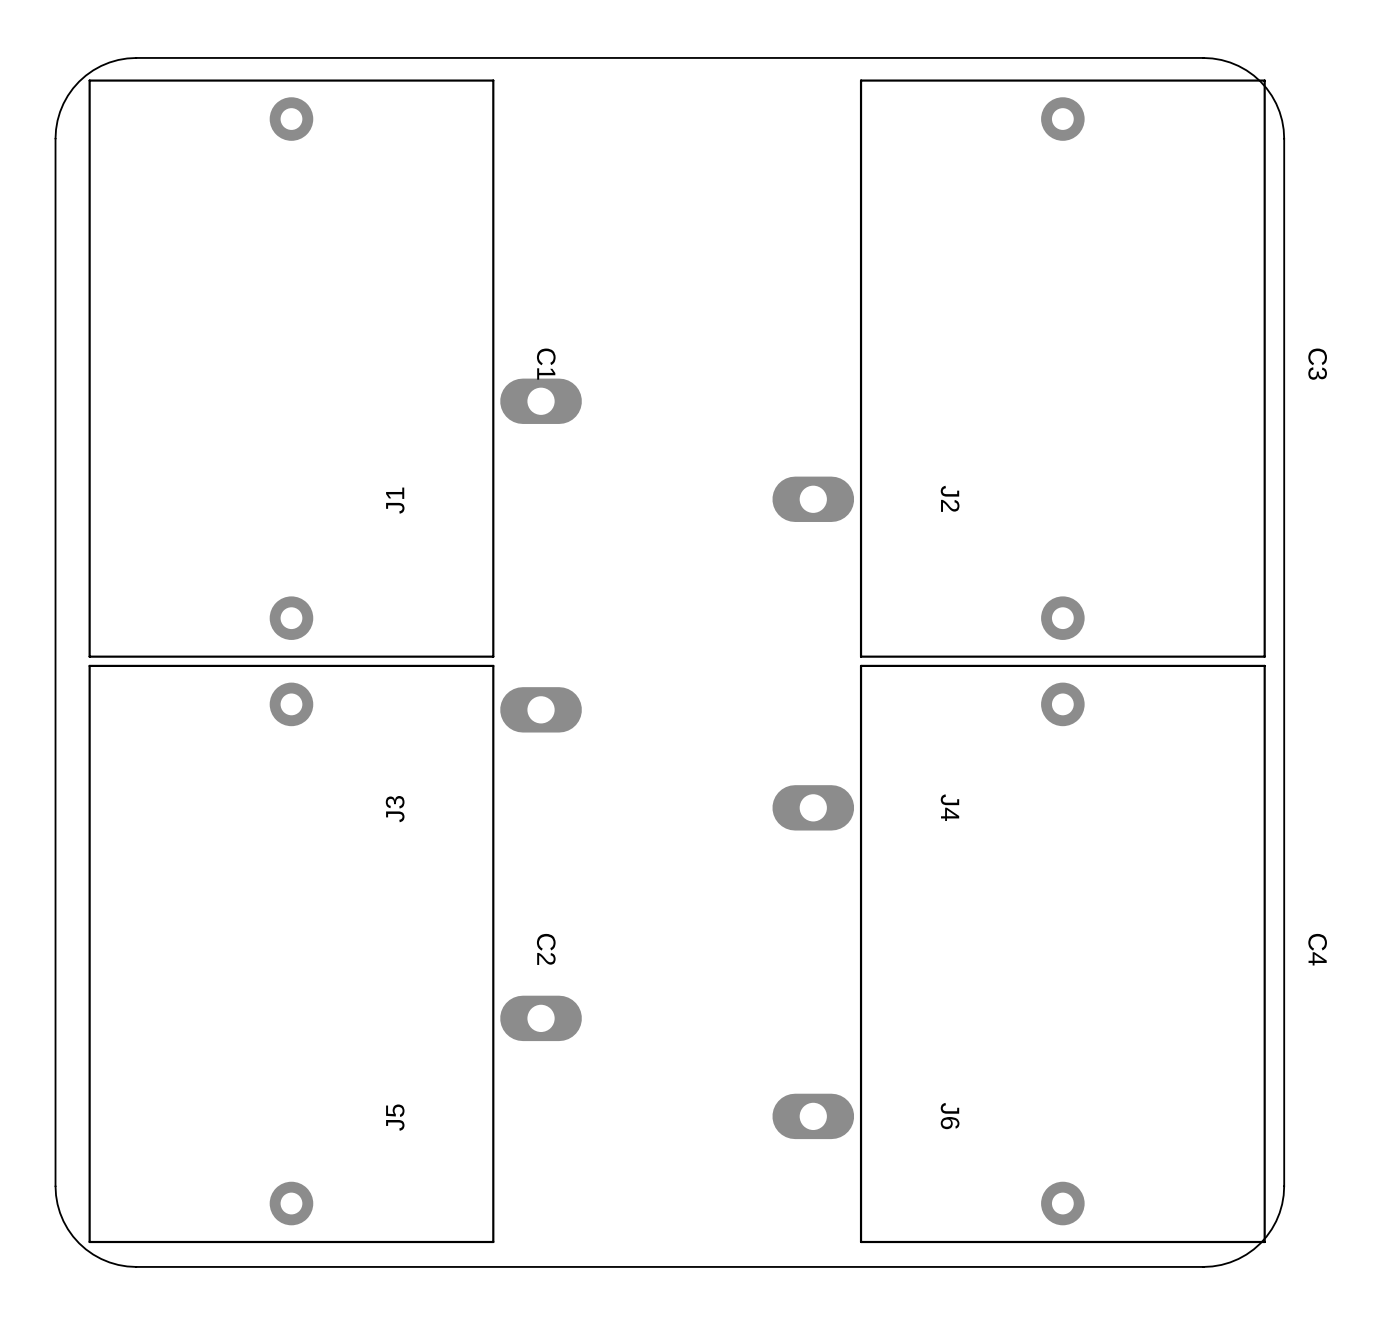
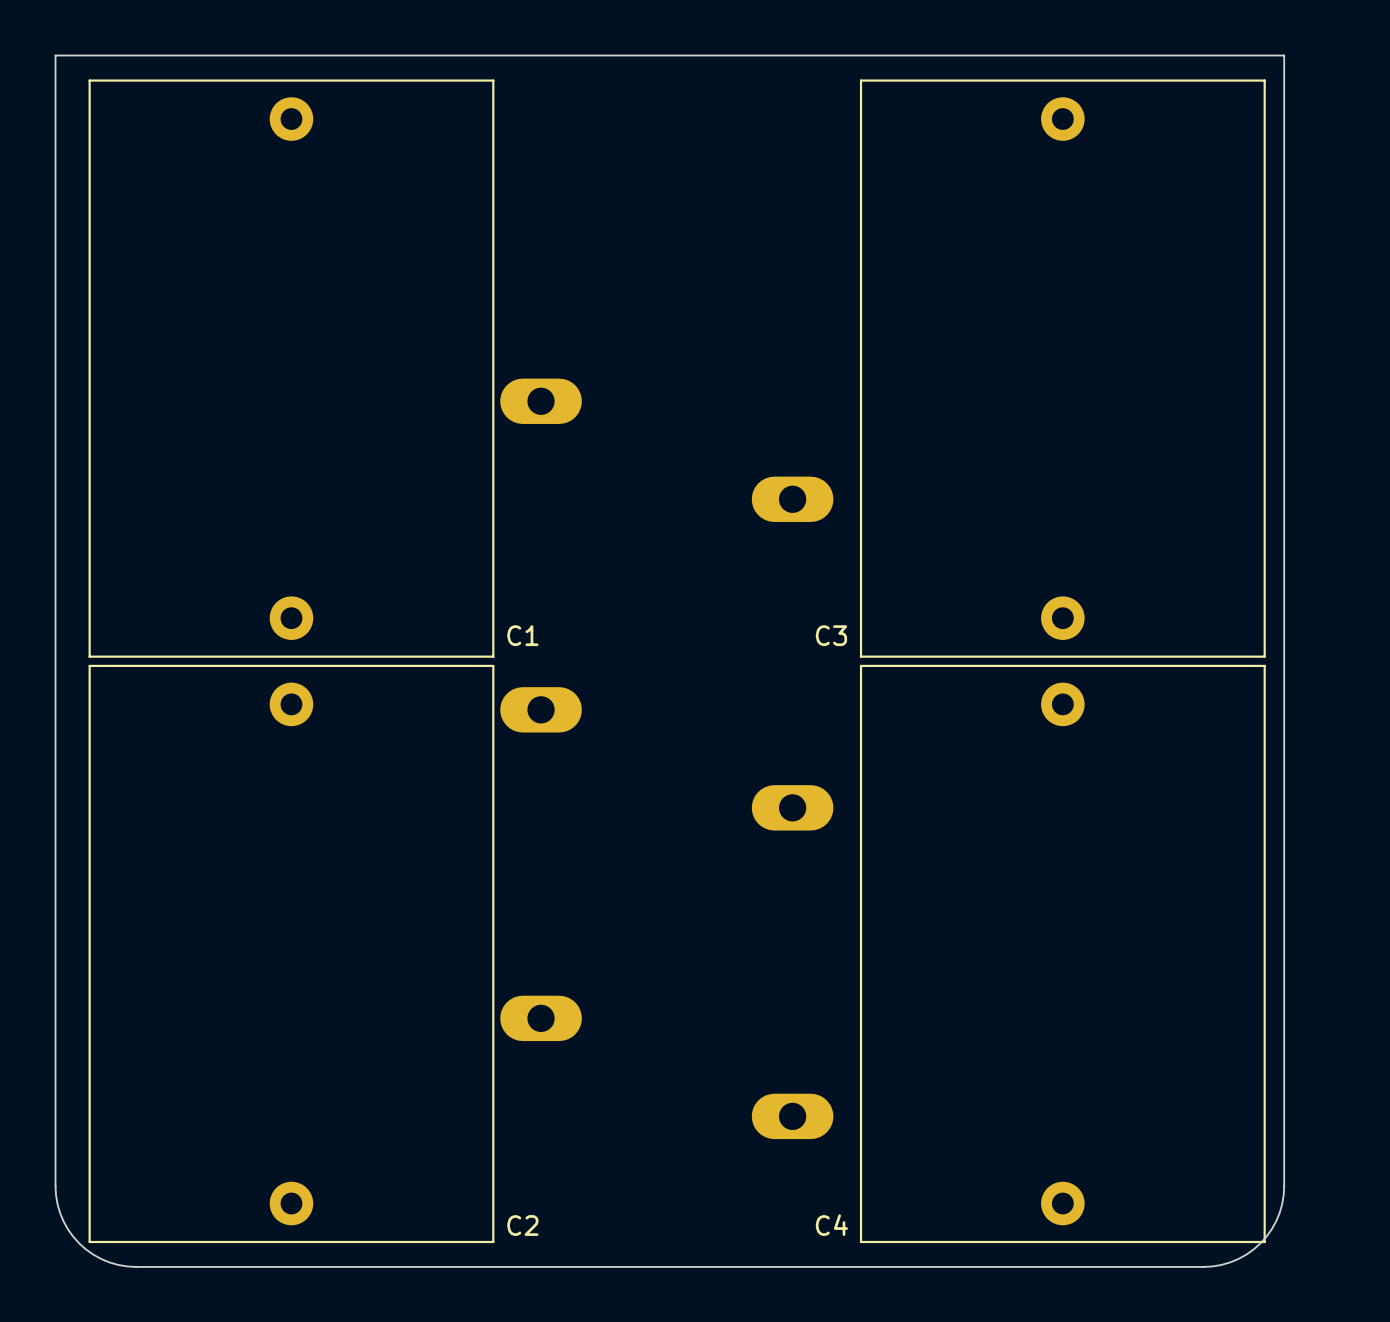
board edge: (55, 138) (57, 120) (63, 103) (79, 81) (101, 65) (118, 59) (136, 57) (1203, 57) (1230, 62) (1253, 75) (1266, 88) (1276, 103) (1282, 120) (1284, 138) (1284, 1186) -> (55, 138) (55, 55) (1284, 55) (1284, 1186)
C1 name rotation: 0° (546, 364) -> 90° counterclockwise (522, 635)
C1 name position: C1 (546, 364) -> C1 (522, 635)
C3 name rotation: 0° (1317, 364) -> 90° counterclockwise (831, 635)
C3 name position: C3 (1317, 364) -> C3 (831, 635)
part: none -> (792, 499)
J2: (813, 499) -> none
J1 name: J1 (395, 500) -> none
part: none -> (792, 807)
J4: (813, 807) -> none
J3 name: J3 (395, 809) -> none
C2 name rotation: 0° (546, 949) -> 90° counterclockwise (522, 1225)
C2 name position: C2 (546, 949) -> C2 (522, 1225)
C4 name rotation: 0° (1317, 949) -> 90° counterclockwise (831, 1225)
C4 name position: C4 (1317, 949) -> C4 (831, 1225)
part: none -> (792, 1116)
J6: (813, 1116) -> none
J5 name: J5 (395, 1117) -> none

